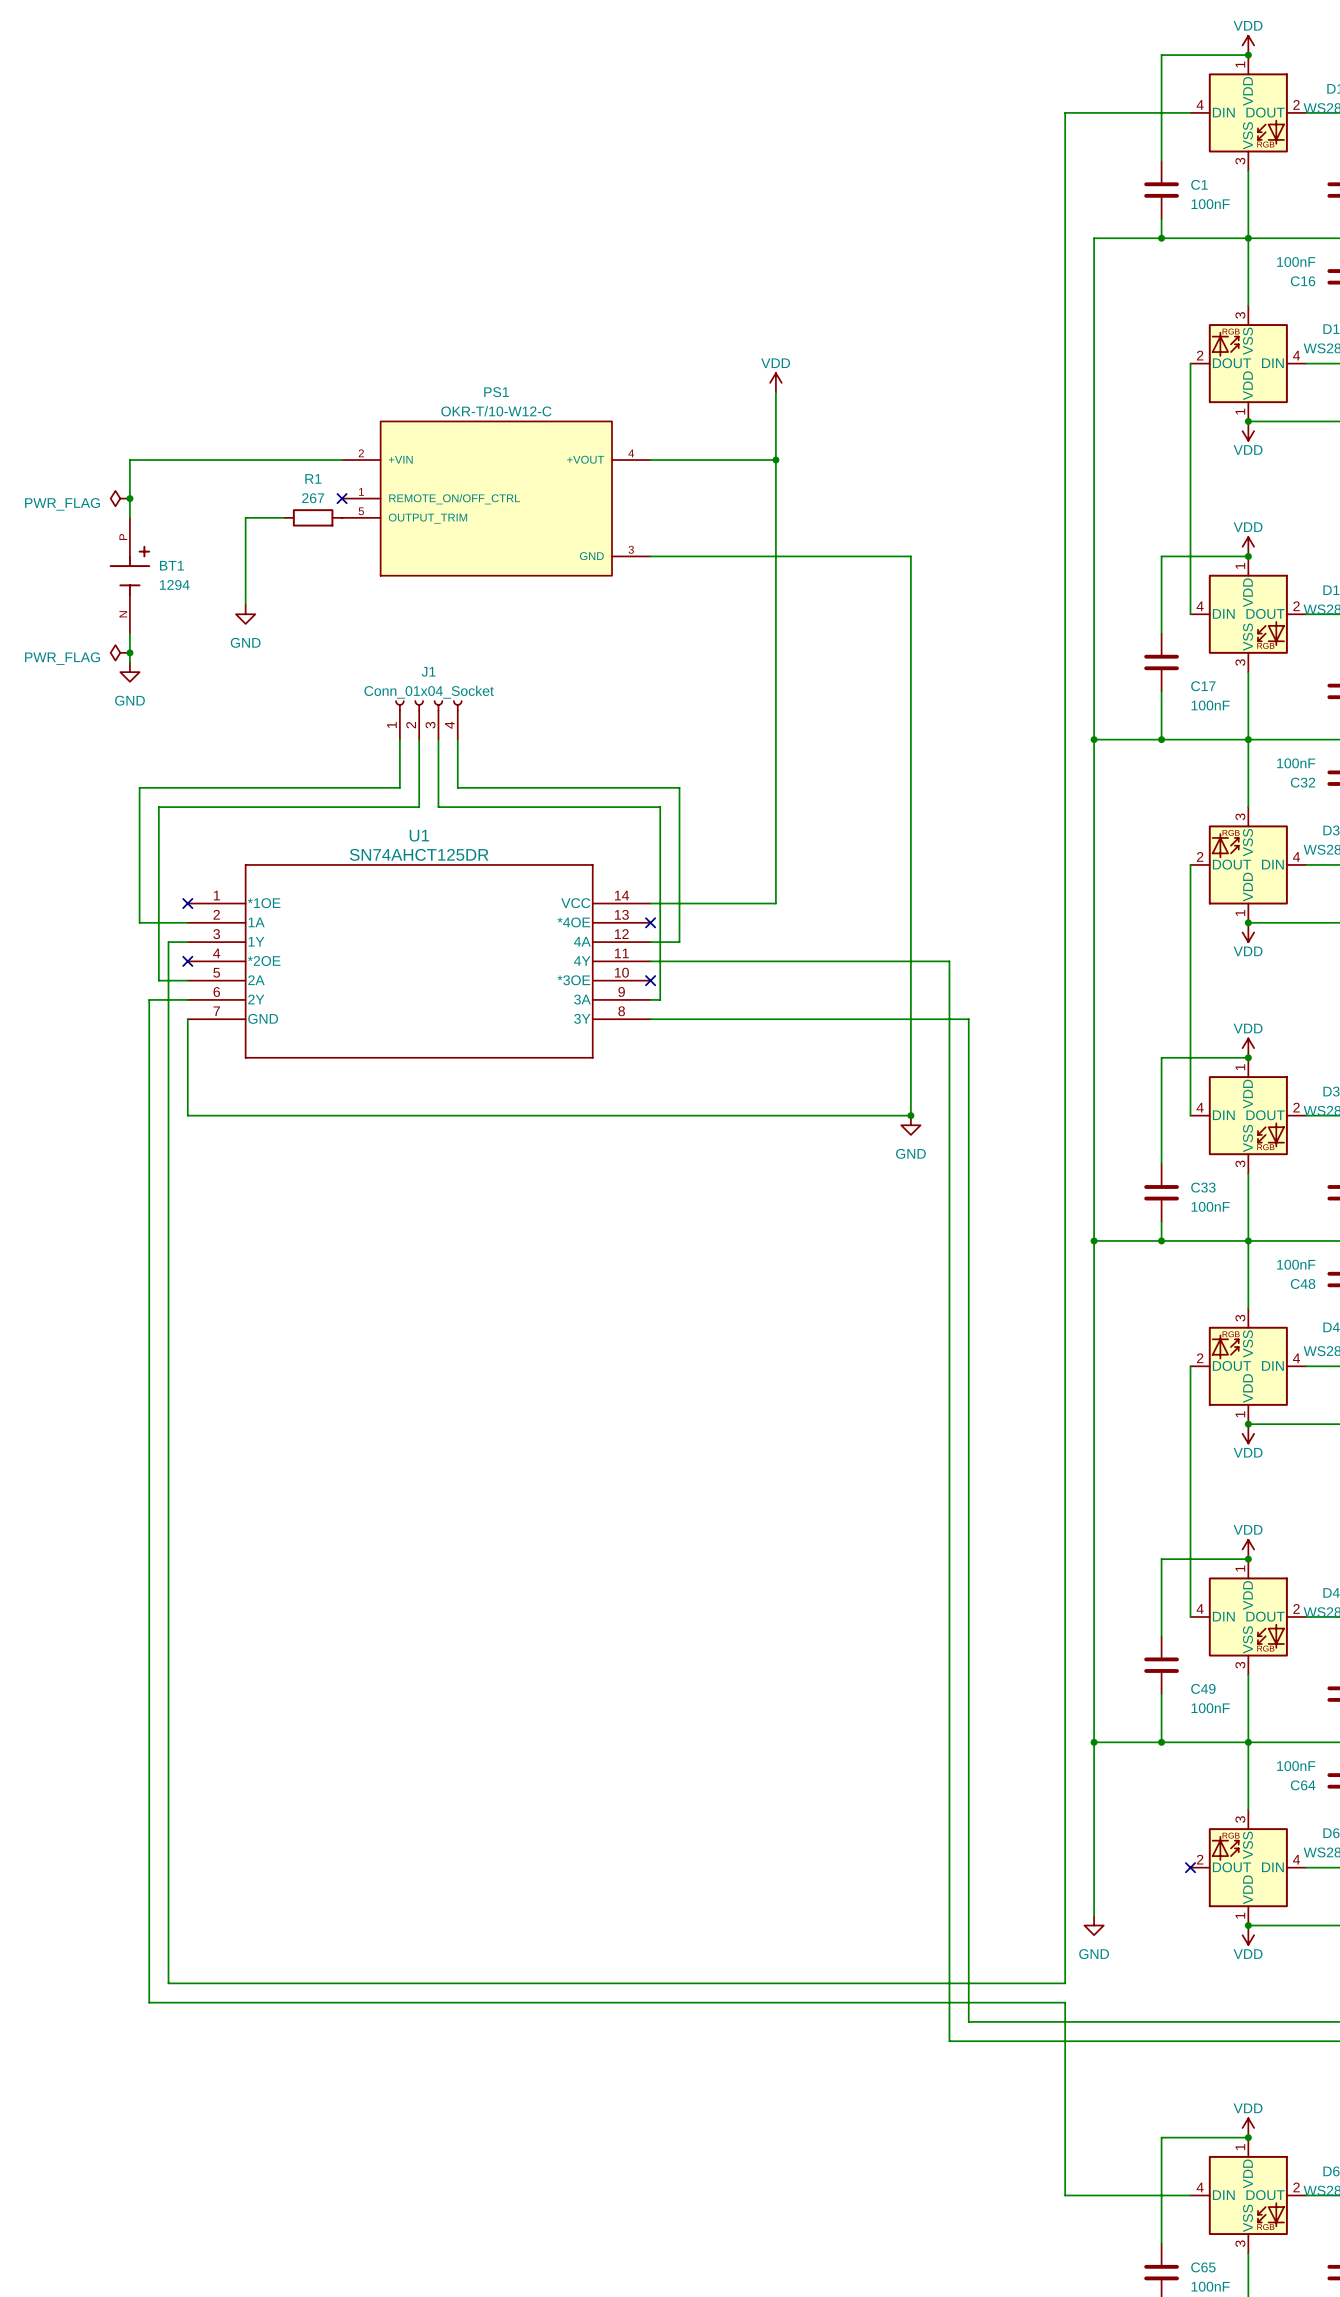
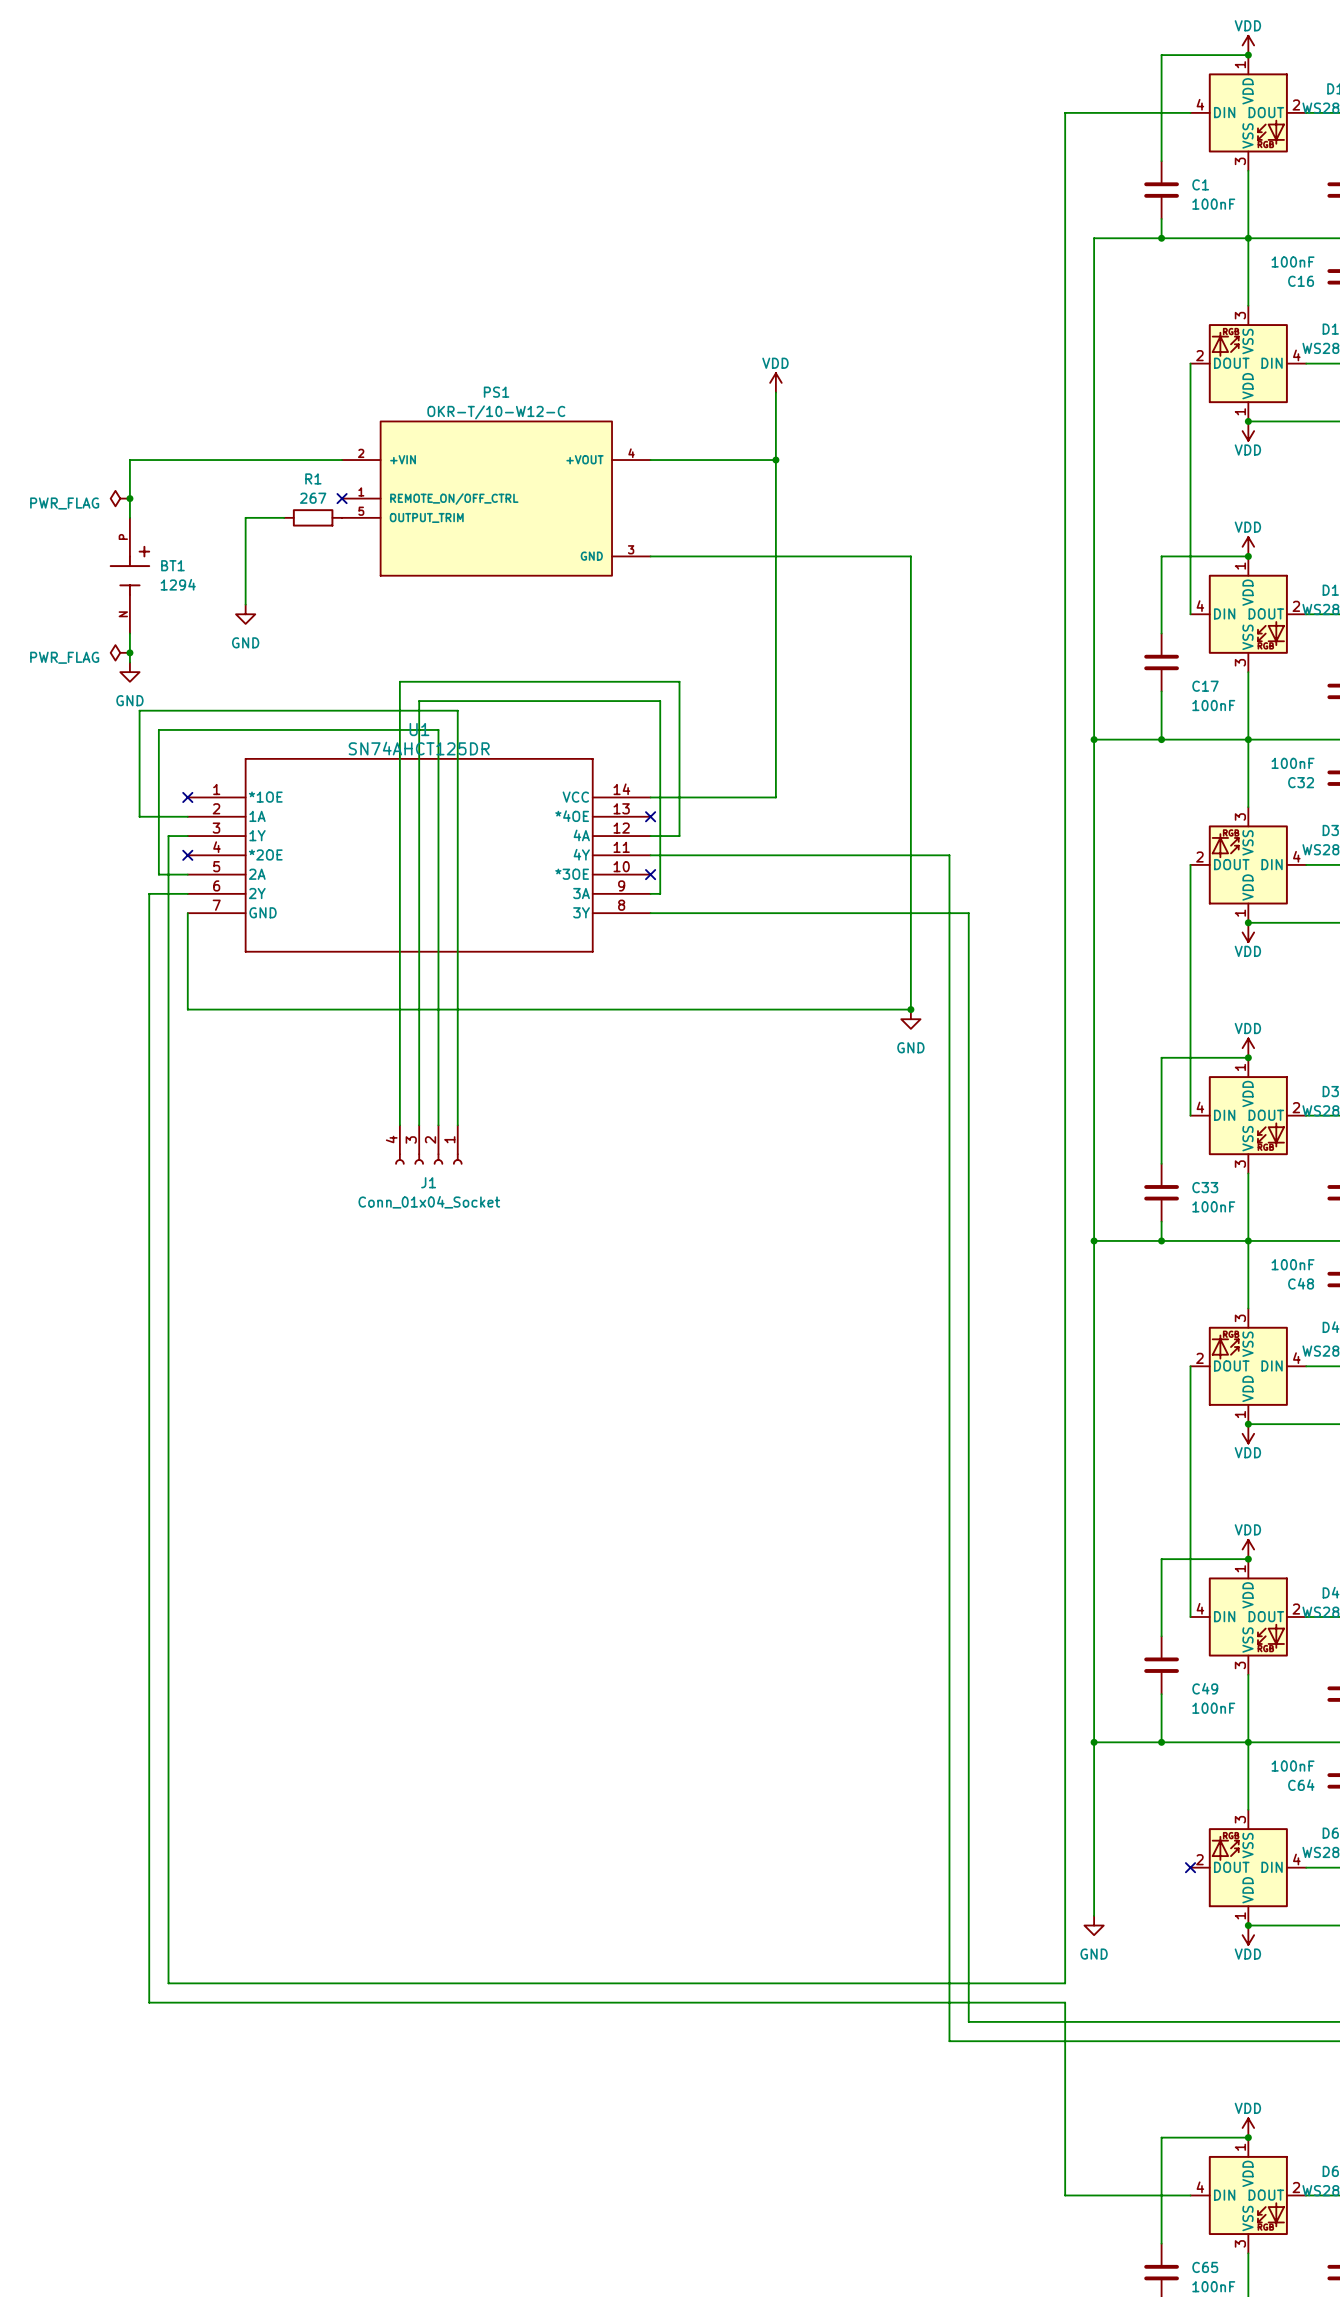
J1 value position: Conn_01x04_Socket (429, 692) -> Conn_01x04_Socket (429, 1202)
J1 rotation: 0° (428, 705) -> 180° (428, 1159)
J1 position: (428, 720) -> (428, 1144)
wire: (139, 787) (399, 787) -> (139, 787) (139, 710) (457, 710) (457, 739)
wire: none -> (399, 787) (399, 1125)
wire: (457, 787) (679, 787) -> (399, 739) (399, 681) (679, 681) (679, 787)
wire: none -> (457, 787) (457, 1125)
no-connect mark: none -> (187, 797)
wire: (775, 797) (775, 903) (650, 903) -> (775, 797) (650, 797)
wire: (158, 807) (419, 807) -> (158, 807) (158, 729) (438, 729) (438, 739)
wire: none -> (419, 807) (419, 1125)
wire: (438, 807) (660, 807) -> (419, 739) (419, 701) (660, 701) (660, 807)
wire: none -> (438, 807) (438, 1125)
wire: (139, 816) (139, 922) (187, 922) -> (139, 816) (187, 816)
no-connect mark: none -> (650, 816)
wire: (679, 836) (679, 942) (650, 942) -> (679, 836) (650, 836)
no-connect mark: none -> (187, 855)
wire: (158, 874) (158, 980) (187, 980) -> (158, 874) (187, 874)
no-connect mark: none -> (650, 874)
wire: (660, 893) (660, 999) (650, 999) -> (660, 893) (650, 893)
no-connect mark: (187, 903) -> none
no-connect mark: (650, 922) -> none
wire: (168, 942) (187, 942) -> (168, 942) (168, 836) (187, 836)
no-connect mark: (187, 961) -> none
U1 position: (419, 961) -> (419, 855)
wire: (650, 961) (949, 961) -> (650, 855) (949, 855) (949, 961)
no-connect mark: (650, 980) -> none
wire: (149, 999) (187, 999) -> (149, 999) (149, 893) (187, 893)
wire: (910, 1009) (910, 1115) (187, 1115) (187, 1019) -> (910, 1009) (187, 1009) (187, 913)
junction: none -> (910, 1009)
wire: (650, 1019) (968, 1019) -> (650, 913) (968, 913) (968, 1019)
junction: (910, 1115) -> none
power symbol position: GND (910, 1125) -> GND (910, 1019)

